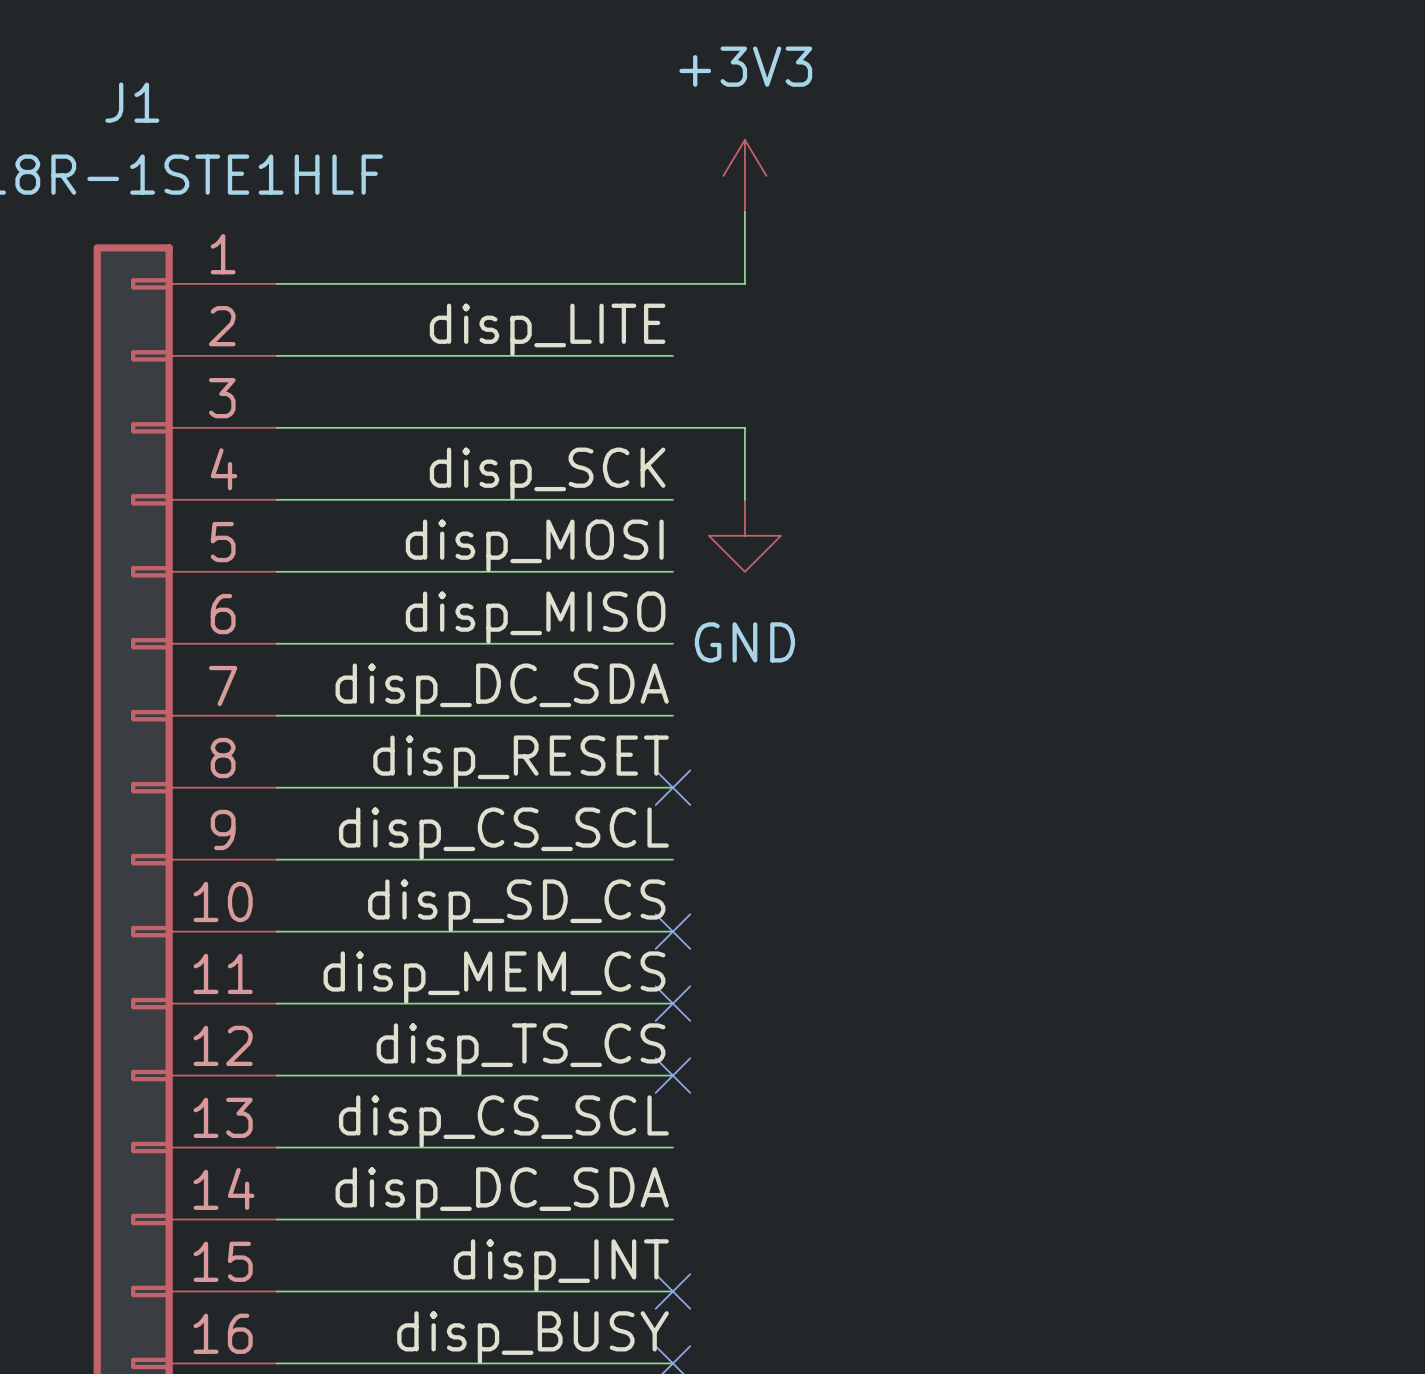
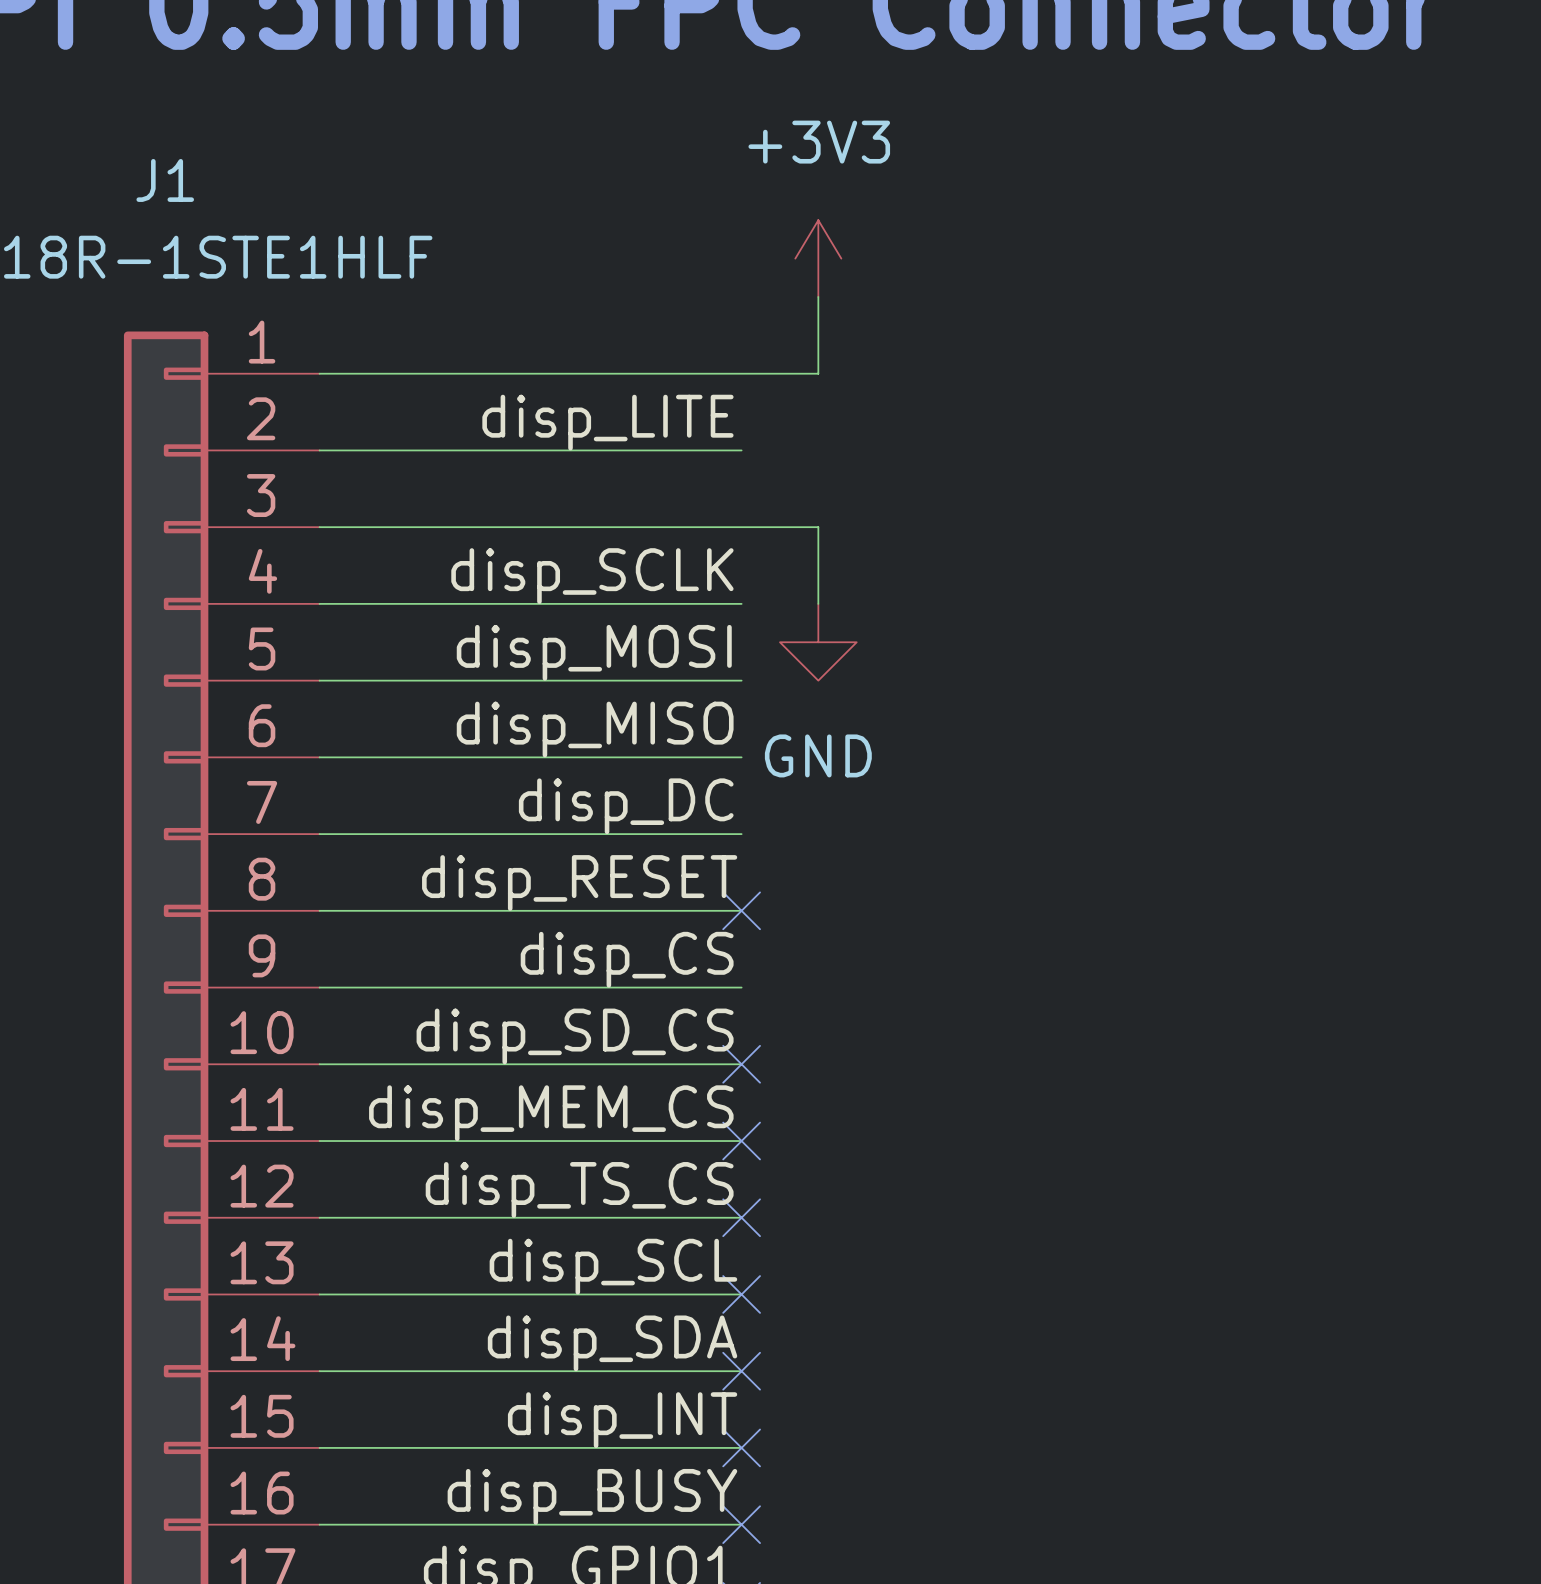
label: disp_SCK (547, 473) -> disp_SCLK (592, 576)
label: disp_DC_SDA (502, 689) -> disp_DC (626, 806)
label: disp_CS_SCL (503, 833) -> disp_CS (627, 959)
label: disp_CS_SCL (503, 1121) -> disp_SCL (613, 1266)
no-connect mark: none -> (741, 1294)
label: disp_DC_SDA (502, 1193) -> disp_SDA (612, 1343)
no-connect mark: none -> (741, 1371)

